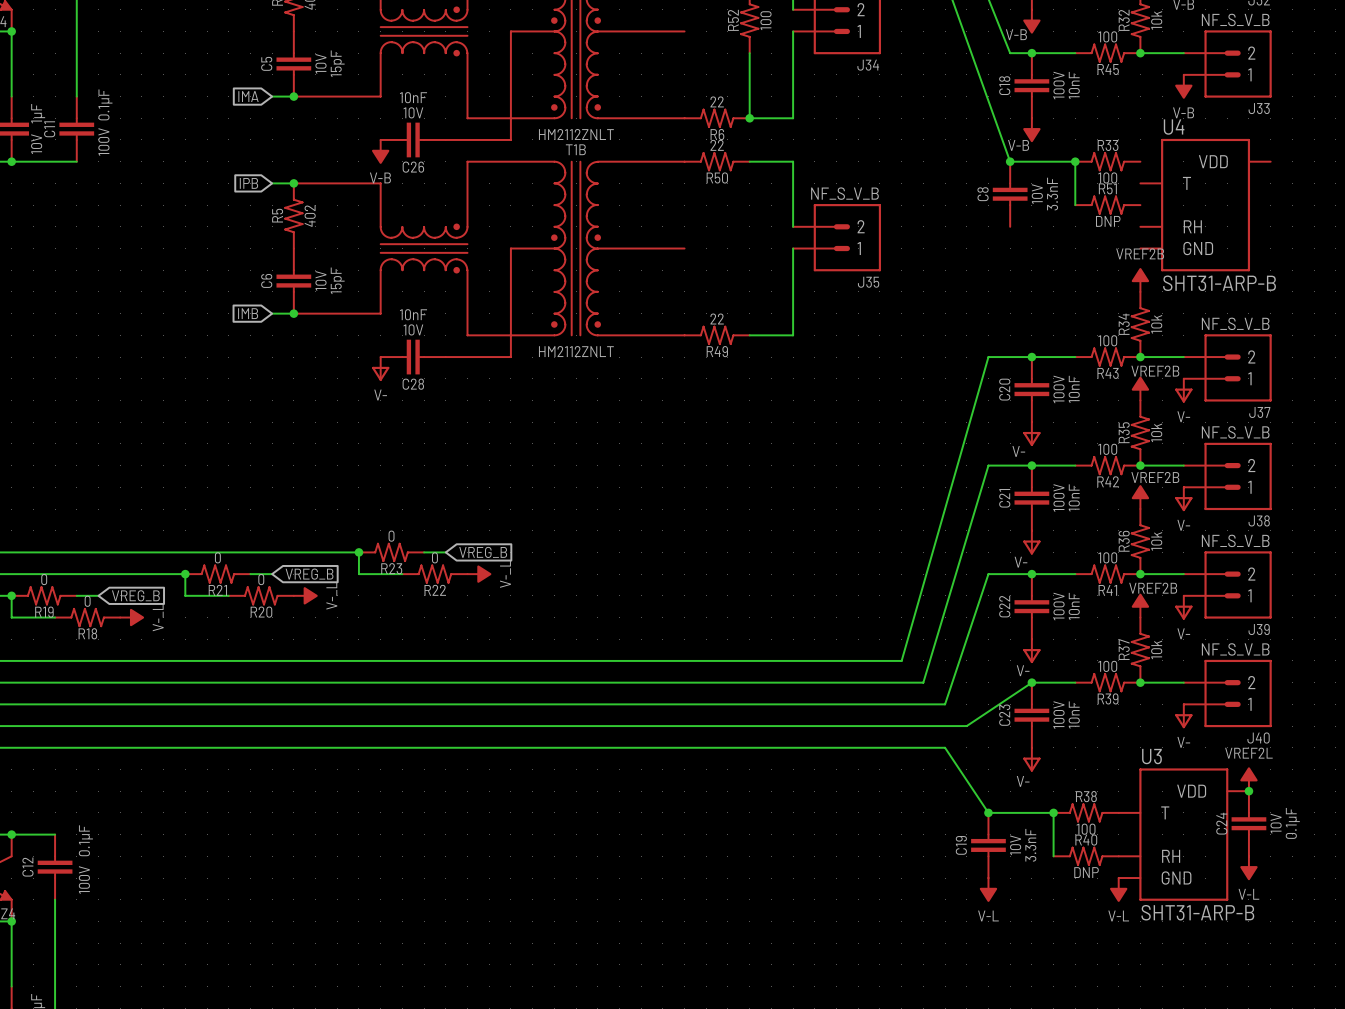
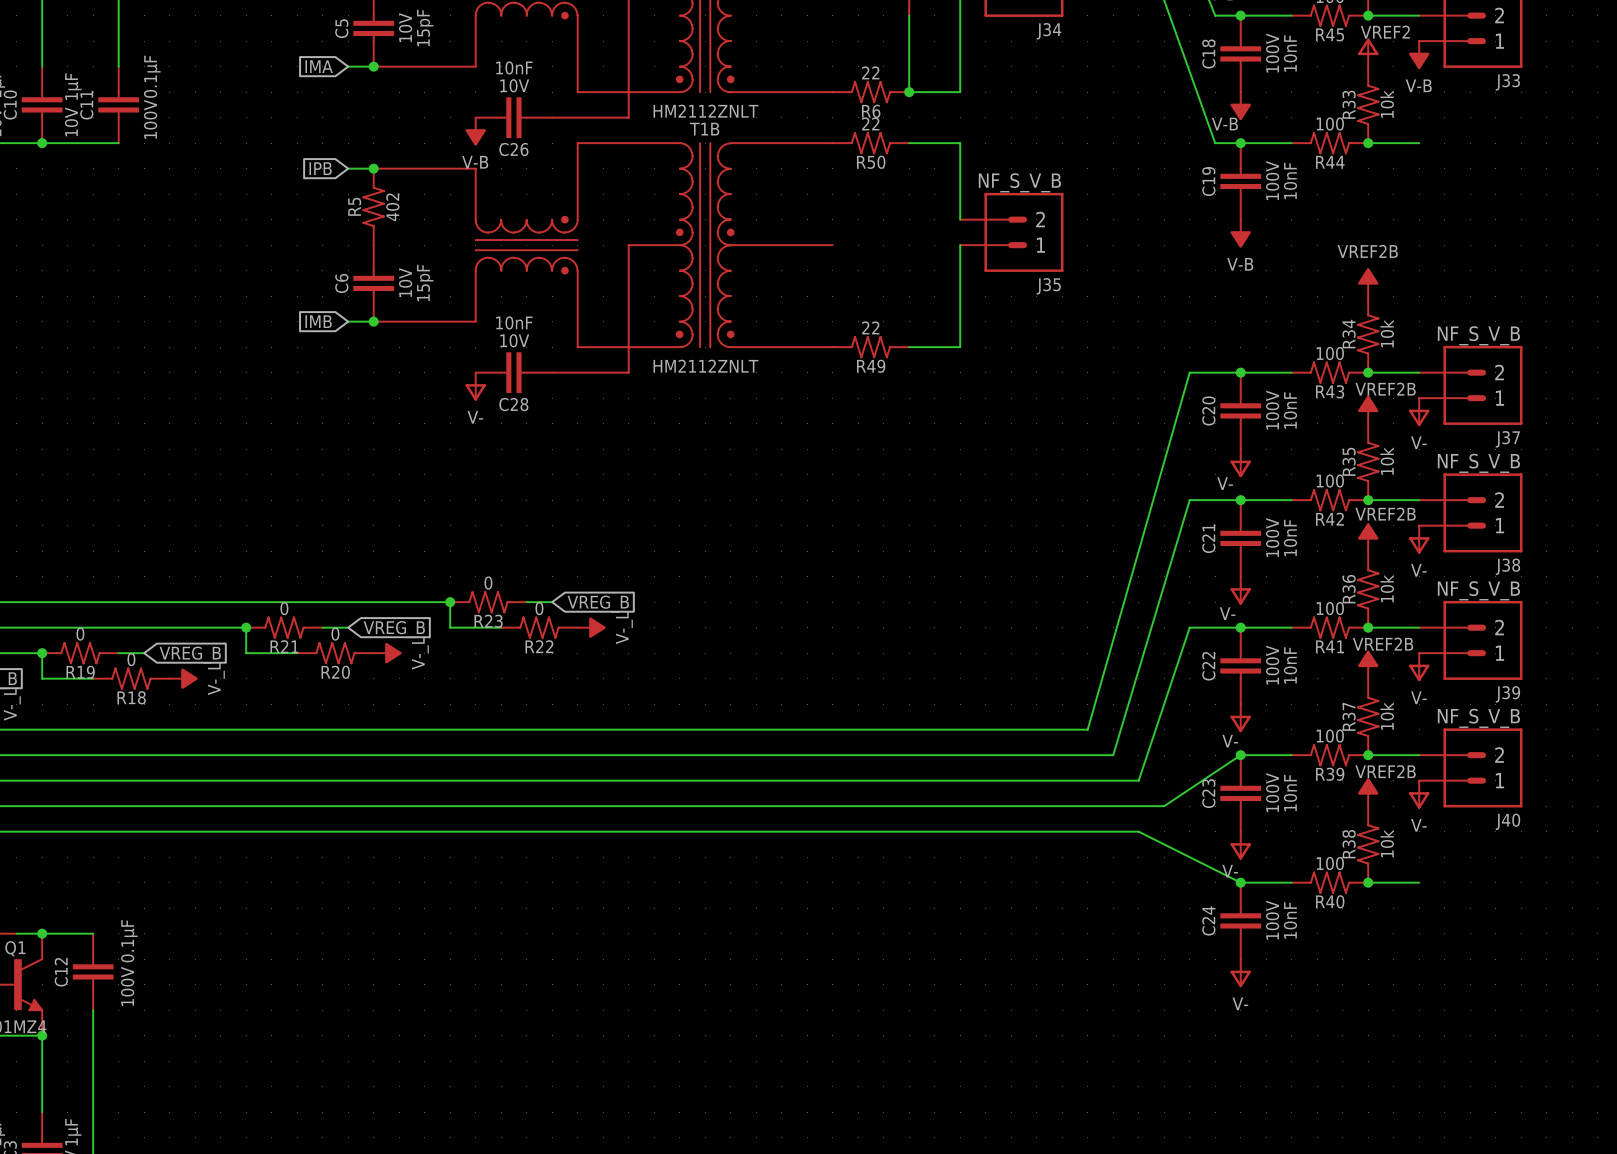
power symbol: none -> VREF2 (1368, 52)
R33: none -> (1368, 104)
R33 name: R33 (1108, 145) -> R44 (1330, 162)
junction: (1010, 161) -> none
junction: none -> (1240, 143)
wire: (1075, 161) (1075, 205) -> none
junction: (1075, 161) -> none
wire: none -> (1368, 143) (1419, 143)
junction: none -> (1368, 143)
R33 text position: 100 (1107, 177) -> 100 (1330, 124)
C8: (1010, 194) -> none
R51: (1107, 205) -> none
U4: (1205, 205) -> none
power symbol: none -> V-B (1240, 233)
power symbol: none -> VREF2B (1368, 792)
wire: (945, 747) (988, 812) (1053, 812) (1053, 856) -> (1138, 831) (1240, 882) (1291, 882)
power symbol: VREF2L (1248, 779) -> none
junction: none -> (1240, 882)
wire: none -> (1368, 882) (1419, 882)
junction: none -> (1368, 882)
junction: (1248, 791) -> none
R38 name position: R38 (1086, 796) -> R38 (1349, 844)
junction: (988, 812) -> none
junction: (1053, 812) -> none
R38 rotation: 0° (1086, 812) -> 90° clockwise (1368, 844)
R38 position: (1086, 812) -> (1368, 844)
C24 position: (1248, 823) -> (1240, 920)
C24 text: 10V (1276, 823) -> 100V (1272, 920)
C24 text: 0.1µF (1292, 823) -> 10nF (1290, 920)
R38 text: 100 (1086, 829) -> 10k (1387, 843)
U3: (1183, 834) -> none
R40 name position: R40 (1086, 840) -> R40 (1330, 901)
C19 position: (988, 845) -> (1240, 181)
C19 text: 10V (1015, 845) -> 100V (1272, 180)
C19 text: 3.3nF (1030, 845) -> 10nF (1290, 180)
R40 position: (1086, 856) -> (1329, 882)
power symbol: none -> V- (1240, 973)
power symbol: V-L (1248, 868) -> none
R40 text: DNP (1086, 872) -> 100 (1330, 863)
power symbol: V-L (988, 889) -> none
power symbol: V-L (1118, 889) -> none

